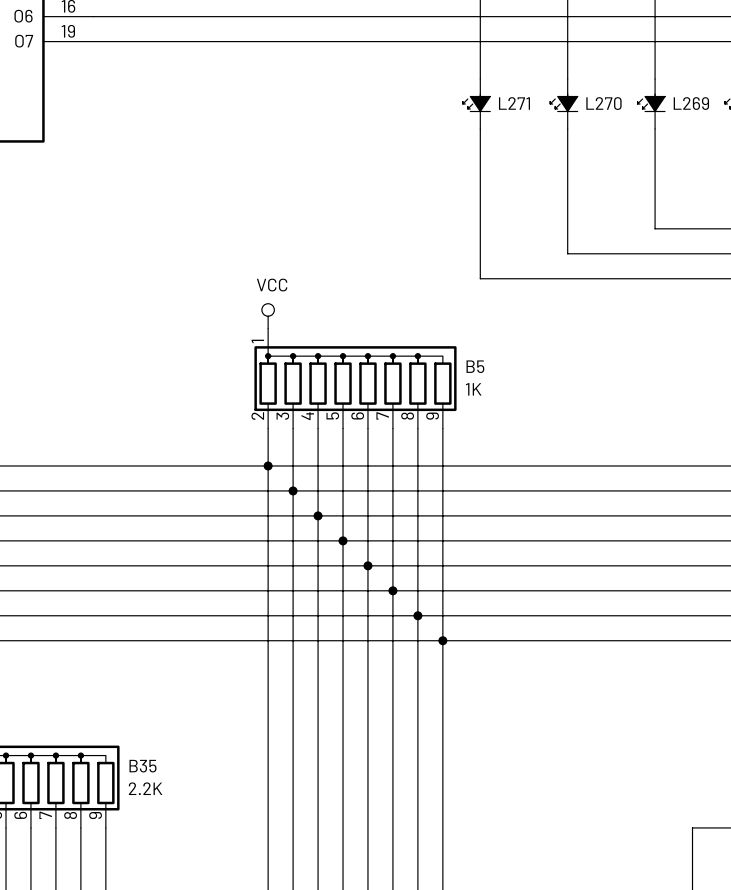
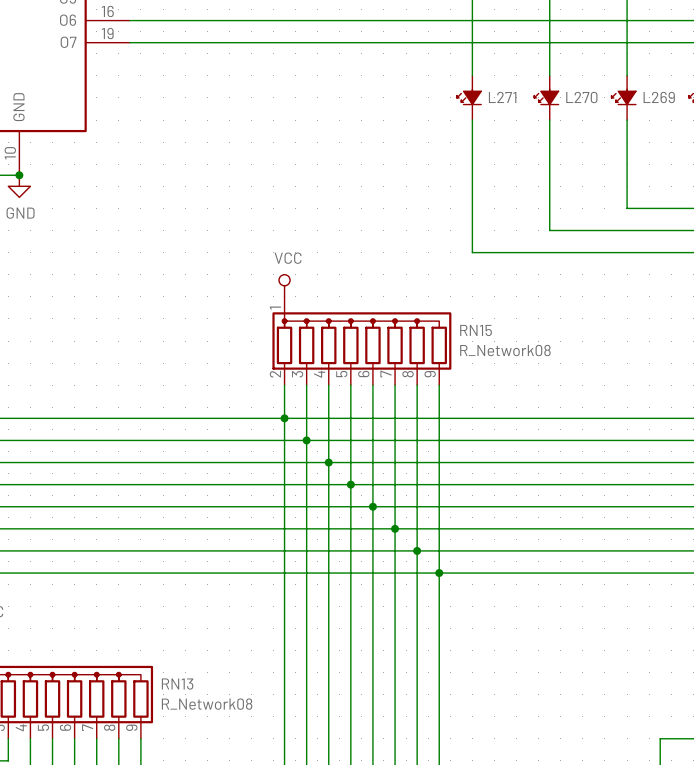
B5 name: B5 (475, 366) -> RN15 (476, 330)
B5 value: 1K (473, 389) -> R_Network08 (505, 350)
B35 name: B35 (142, 766) -> RN13 (177, 684)
B35 value: 2.2K (145, 788) -> R_Network08 (207, 704)

